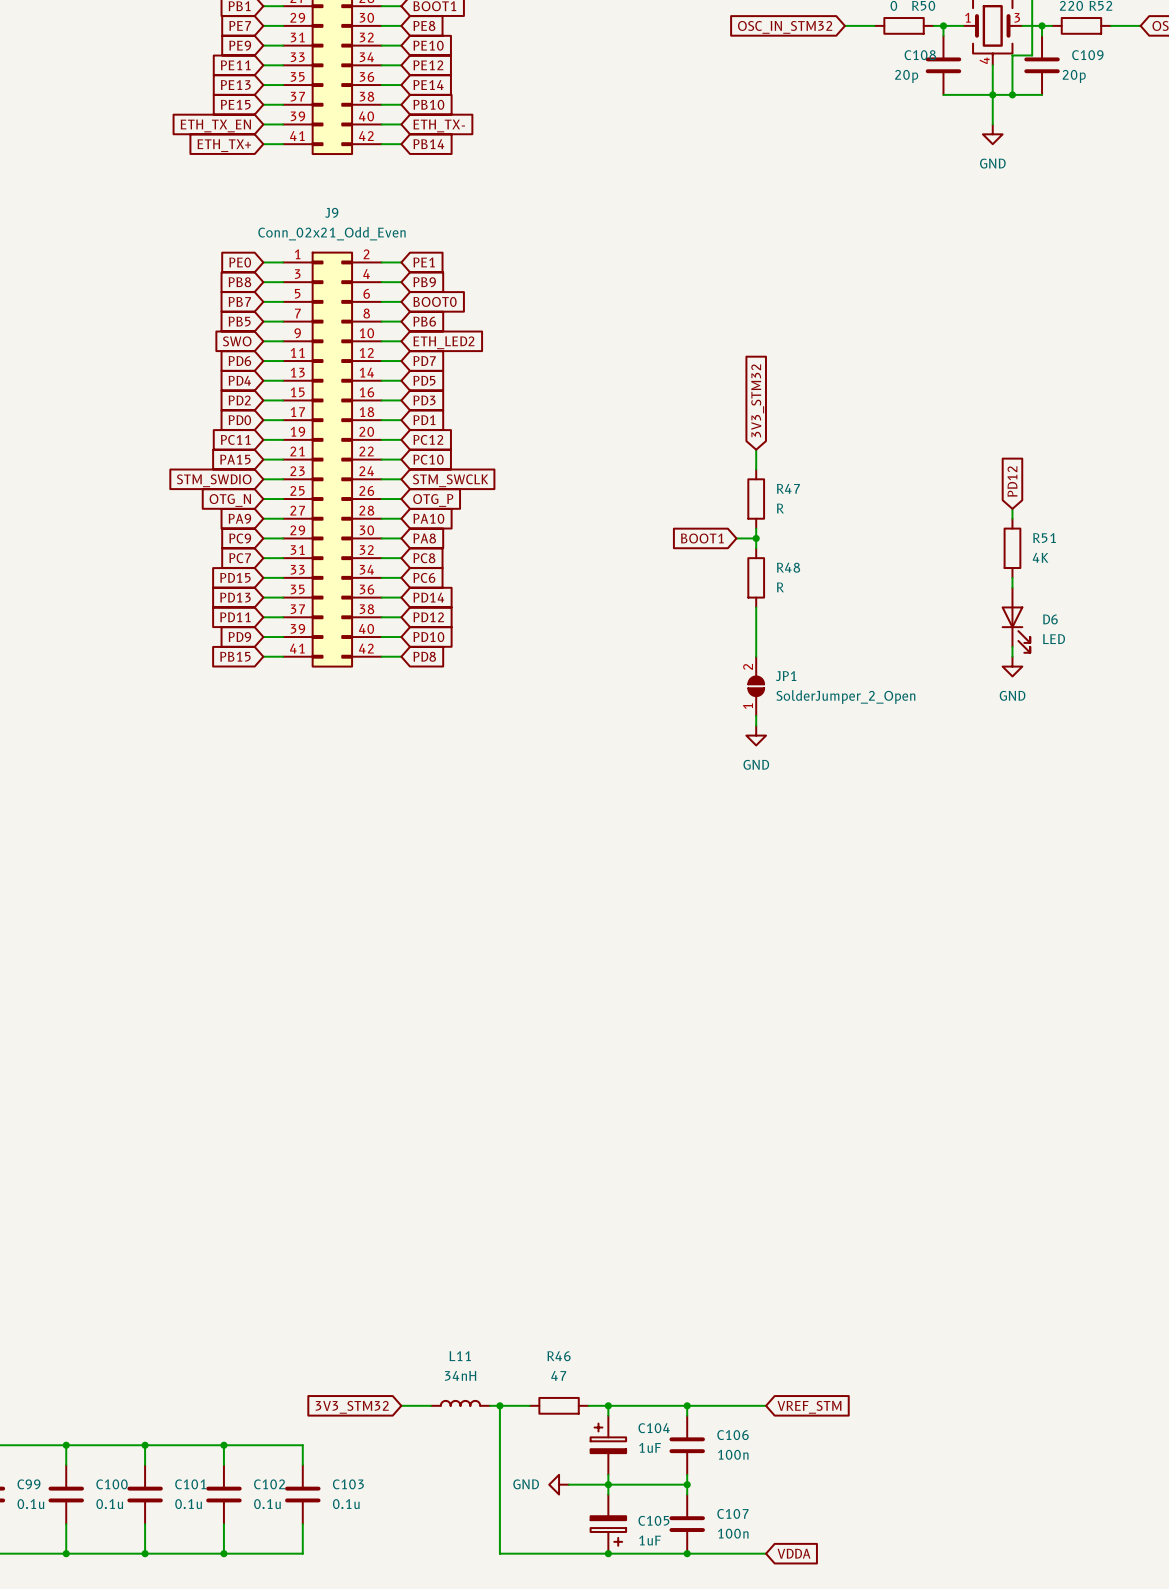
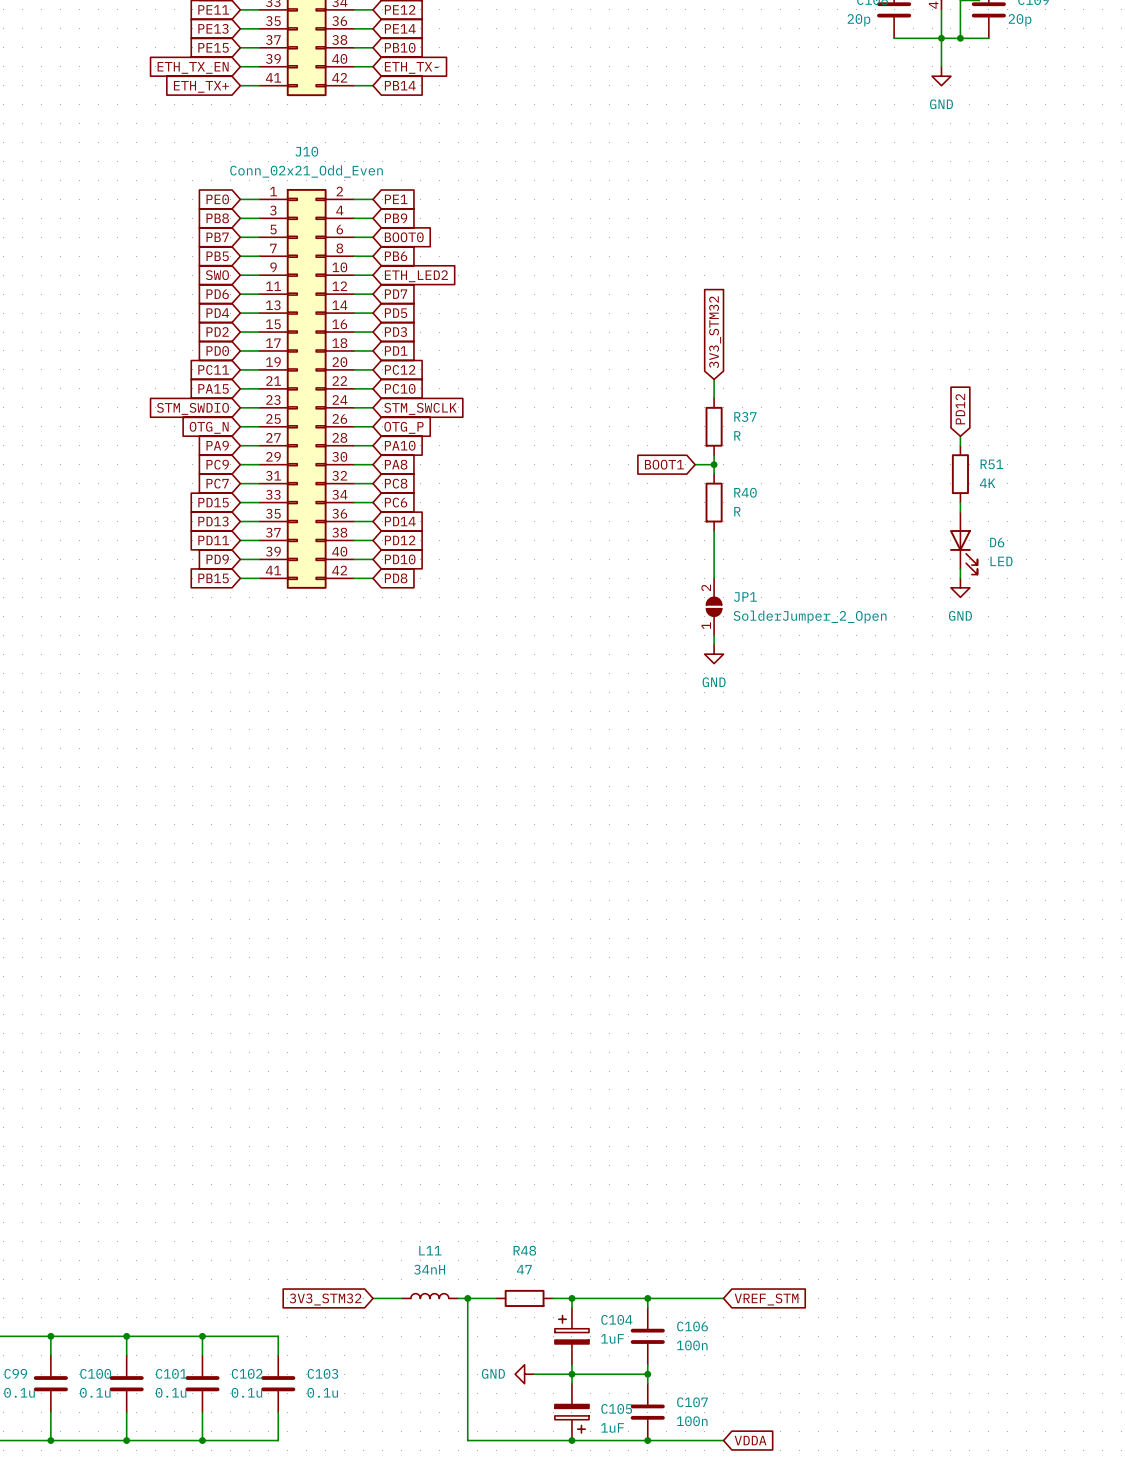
J9 name: J9 (331, 212) -> J10 (306, 151)
R47 name: R47 (788, 488) -> R37 (745, 416)
R48 name: R48 (788, 567) -> R40 (745, 492)
R46 name: R46 (559, 1356) -> R48 (524, 1250)

